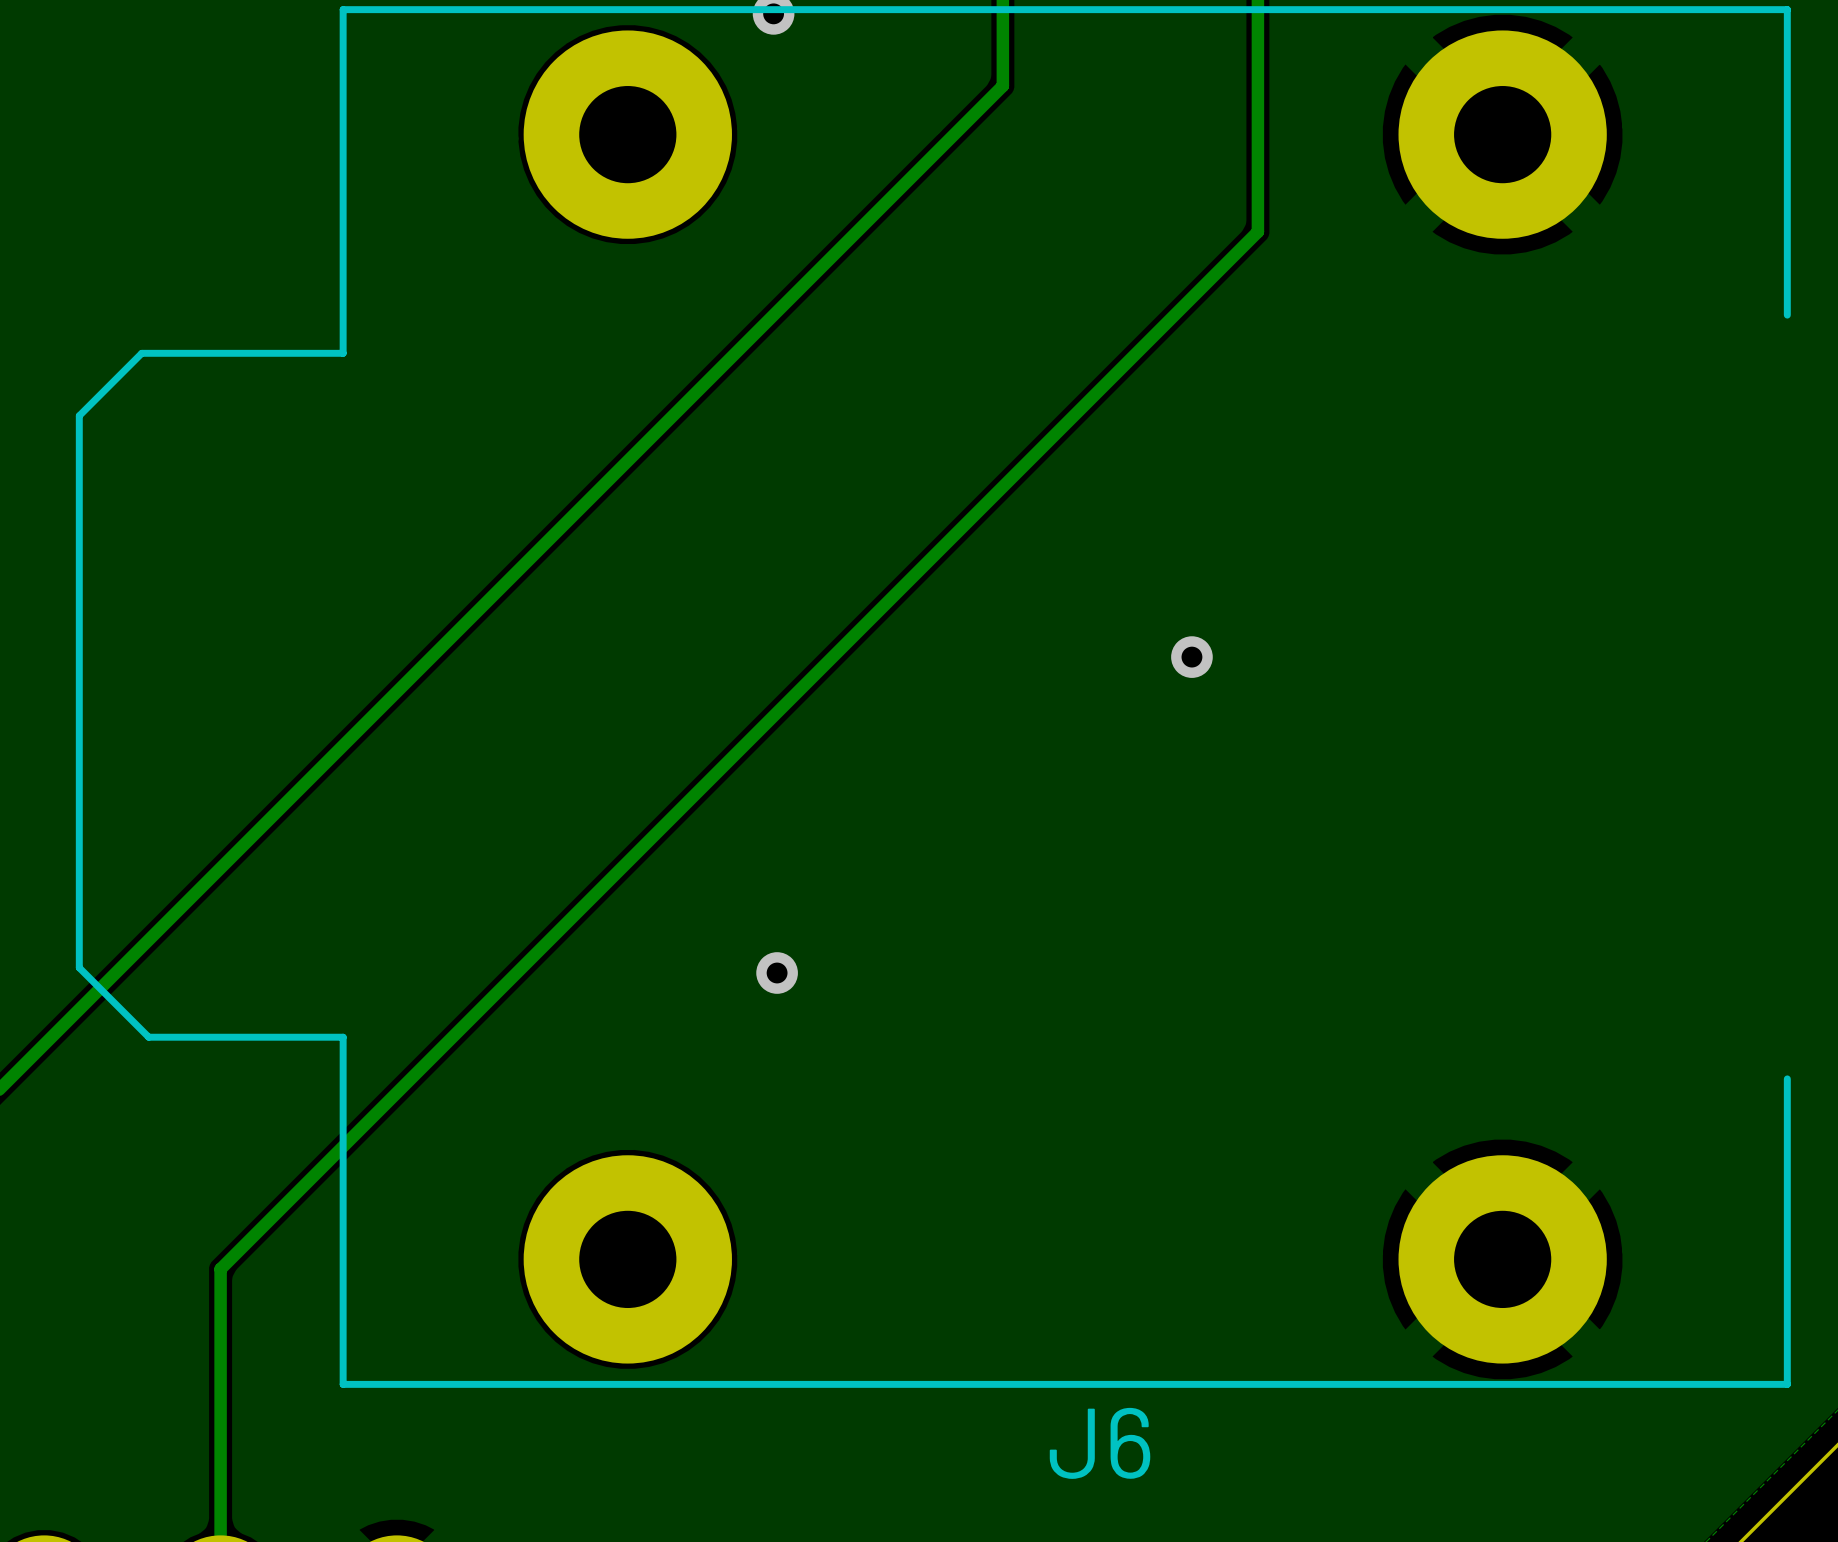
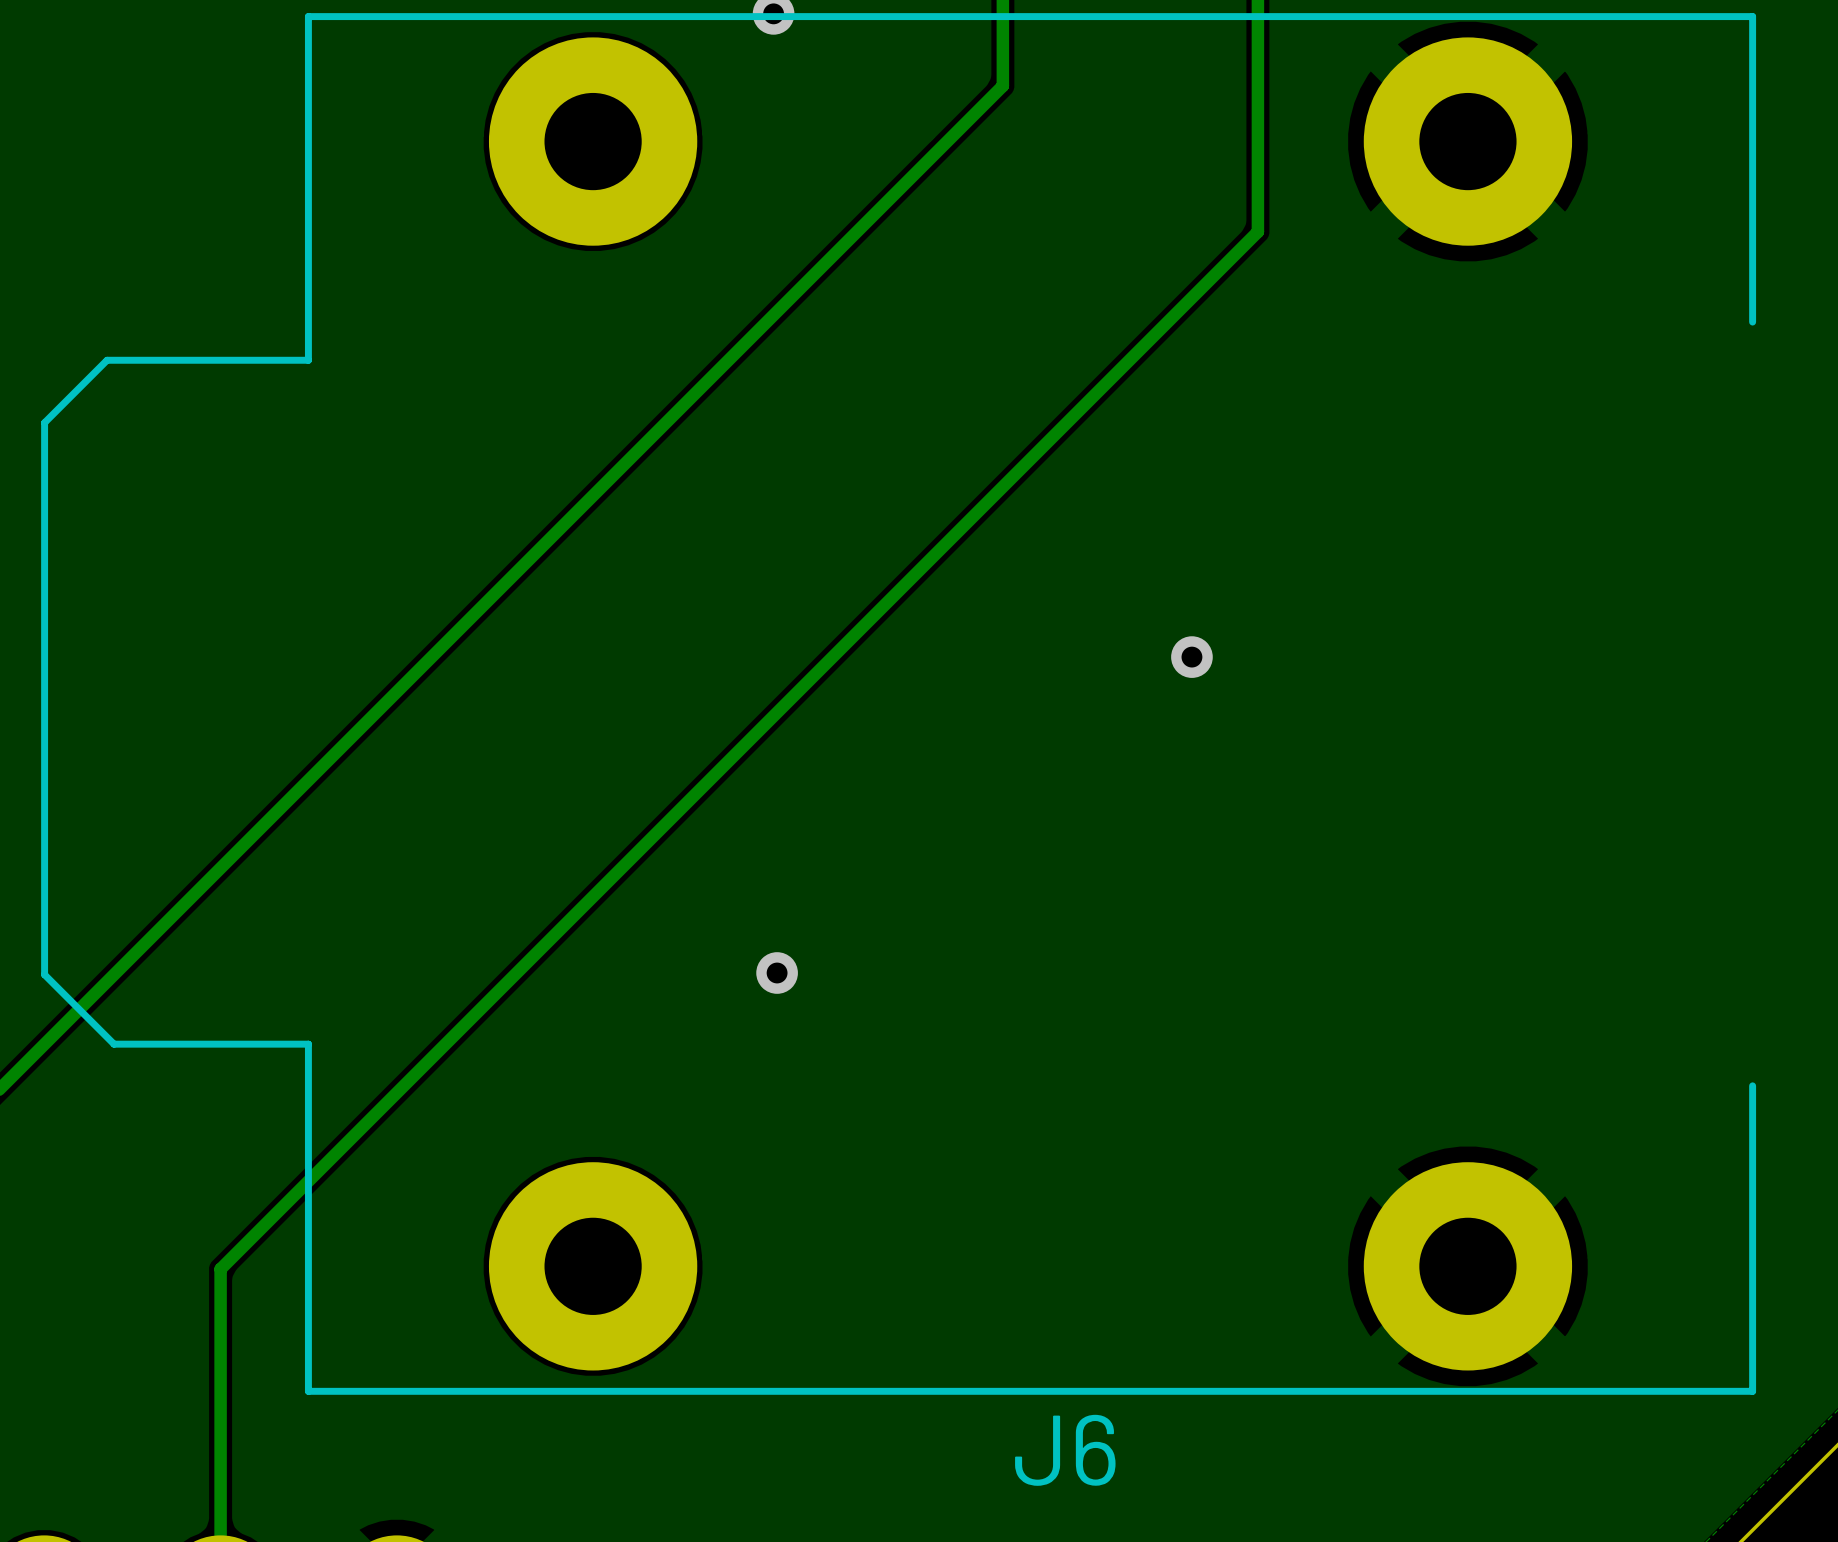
J6 position: (933, 697) -> (898, 703)

